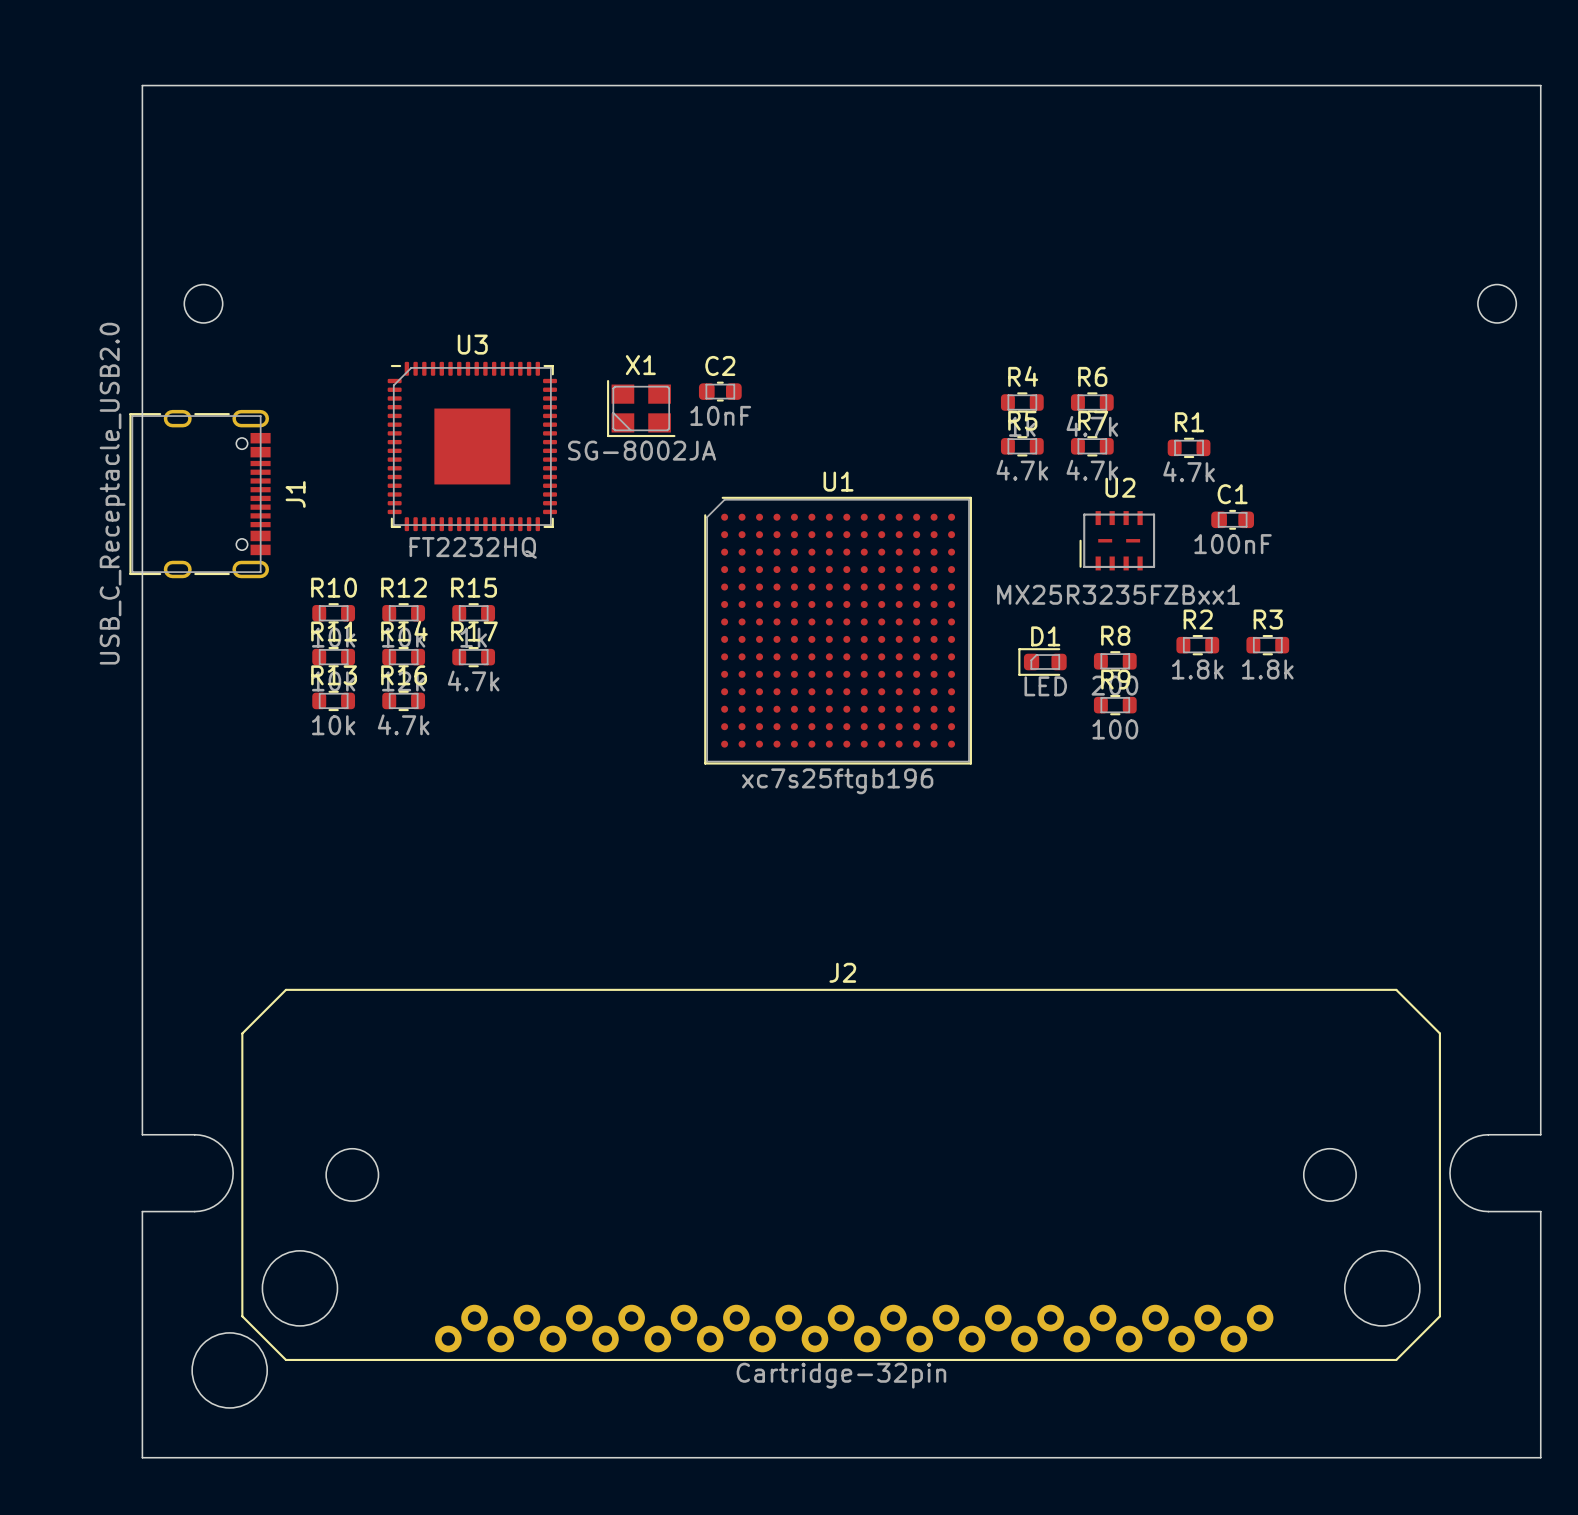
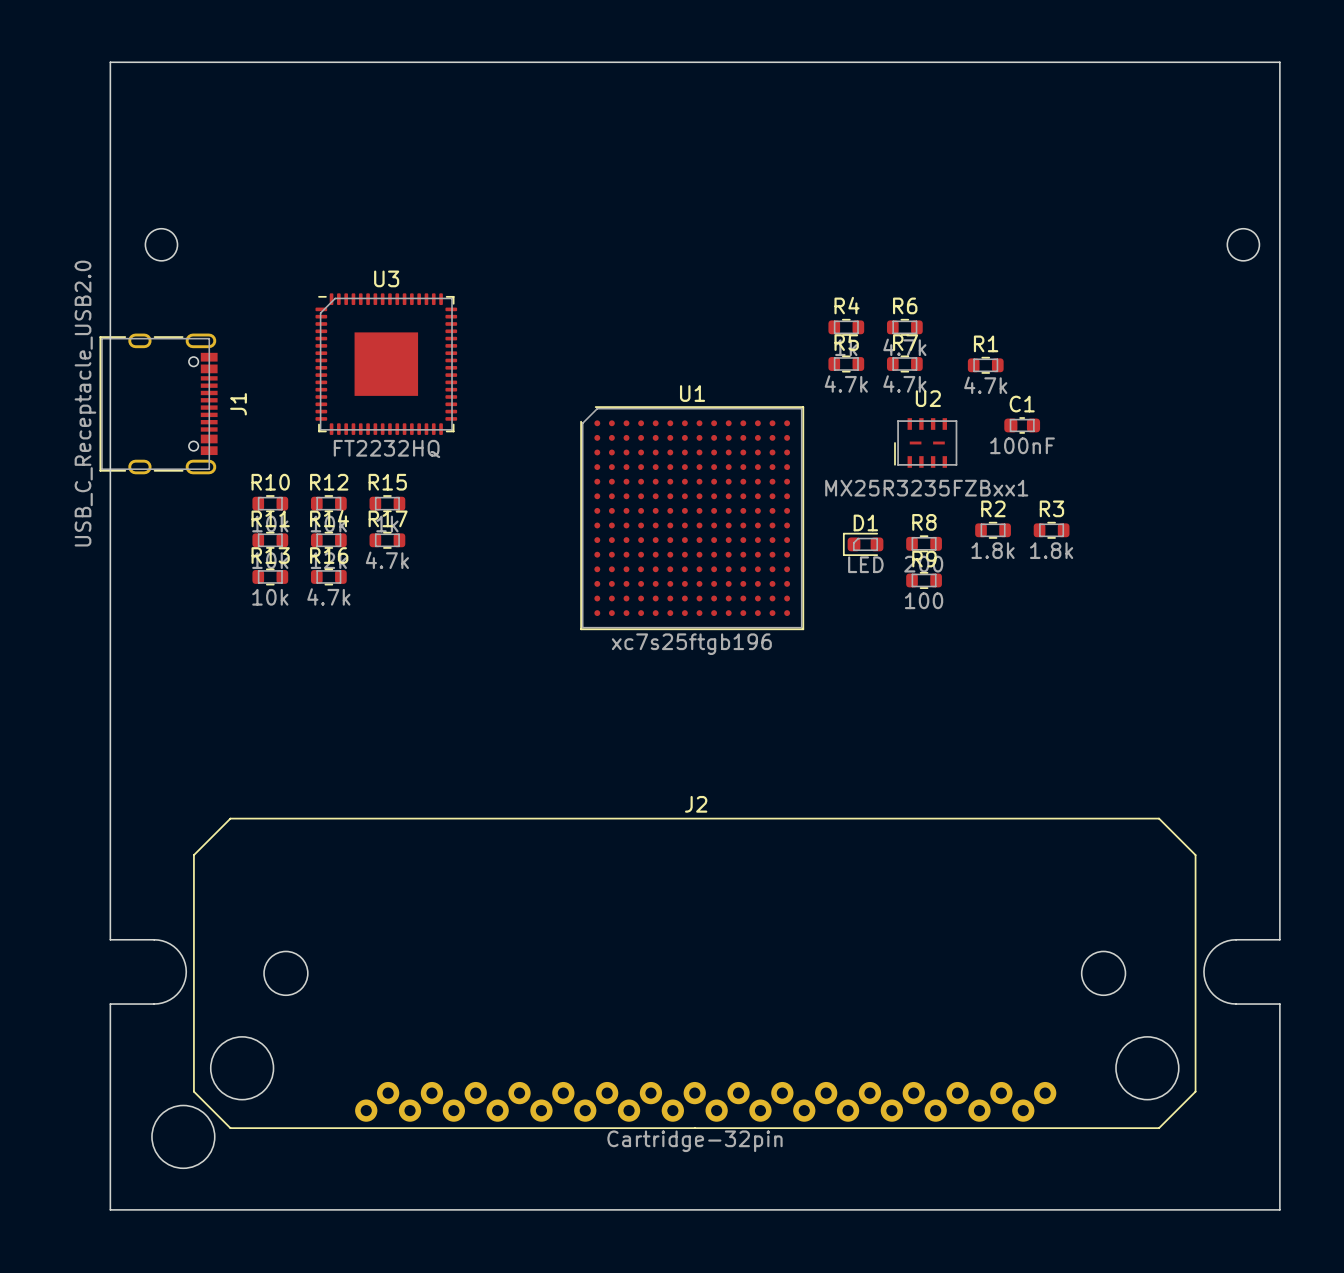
C2: 10nF (720, 391) -> none
X1: SG-8002JA (641, 408) -> none

